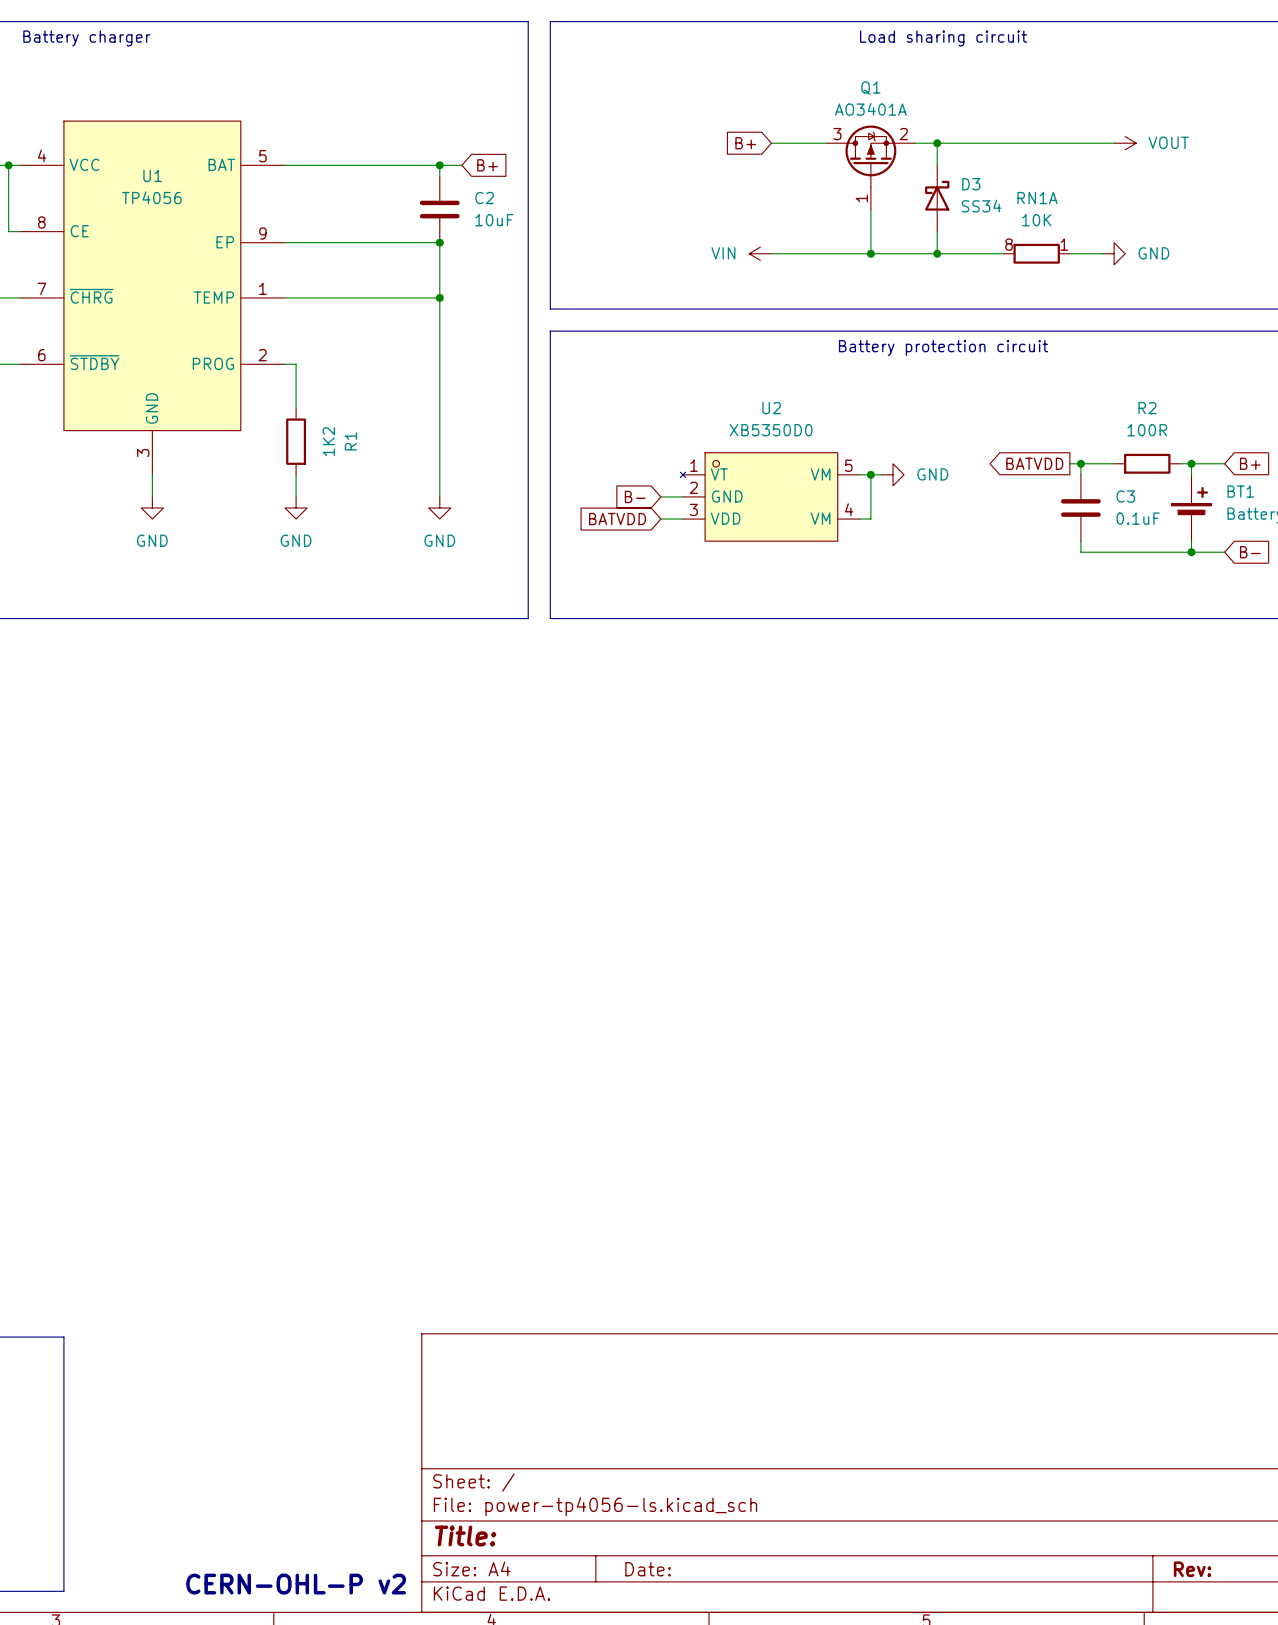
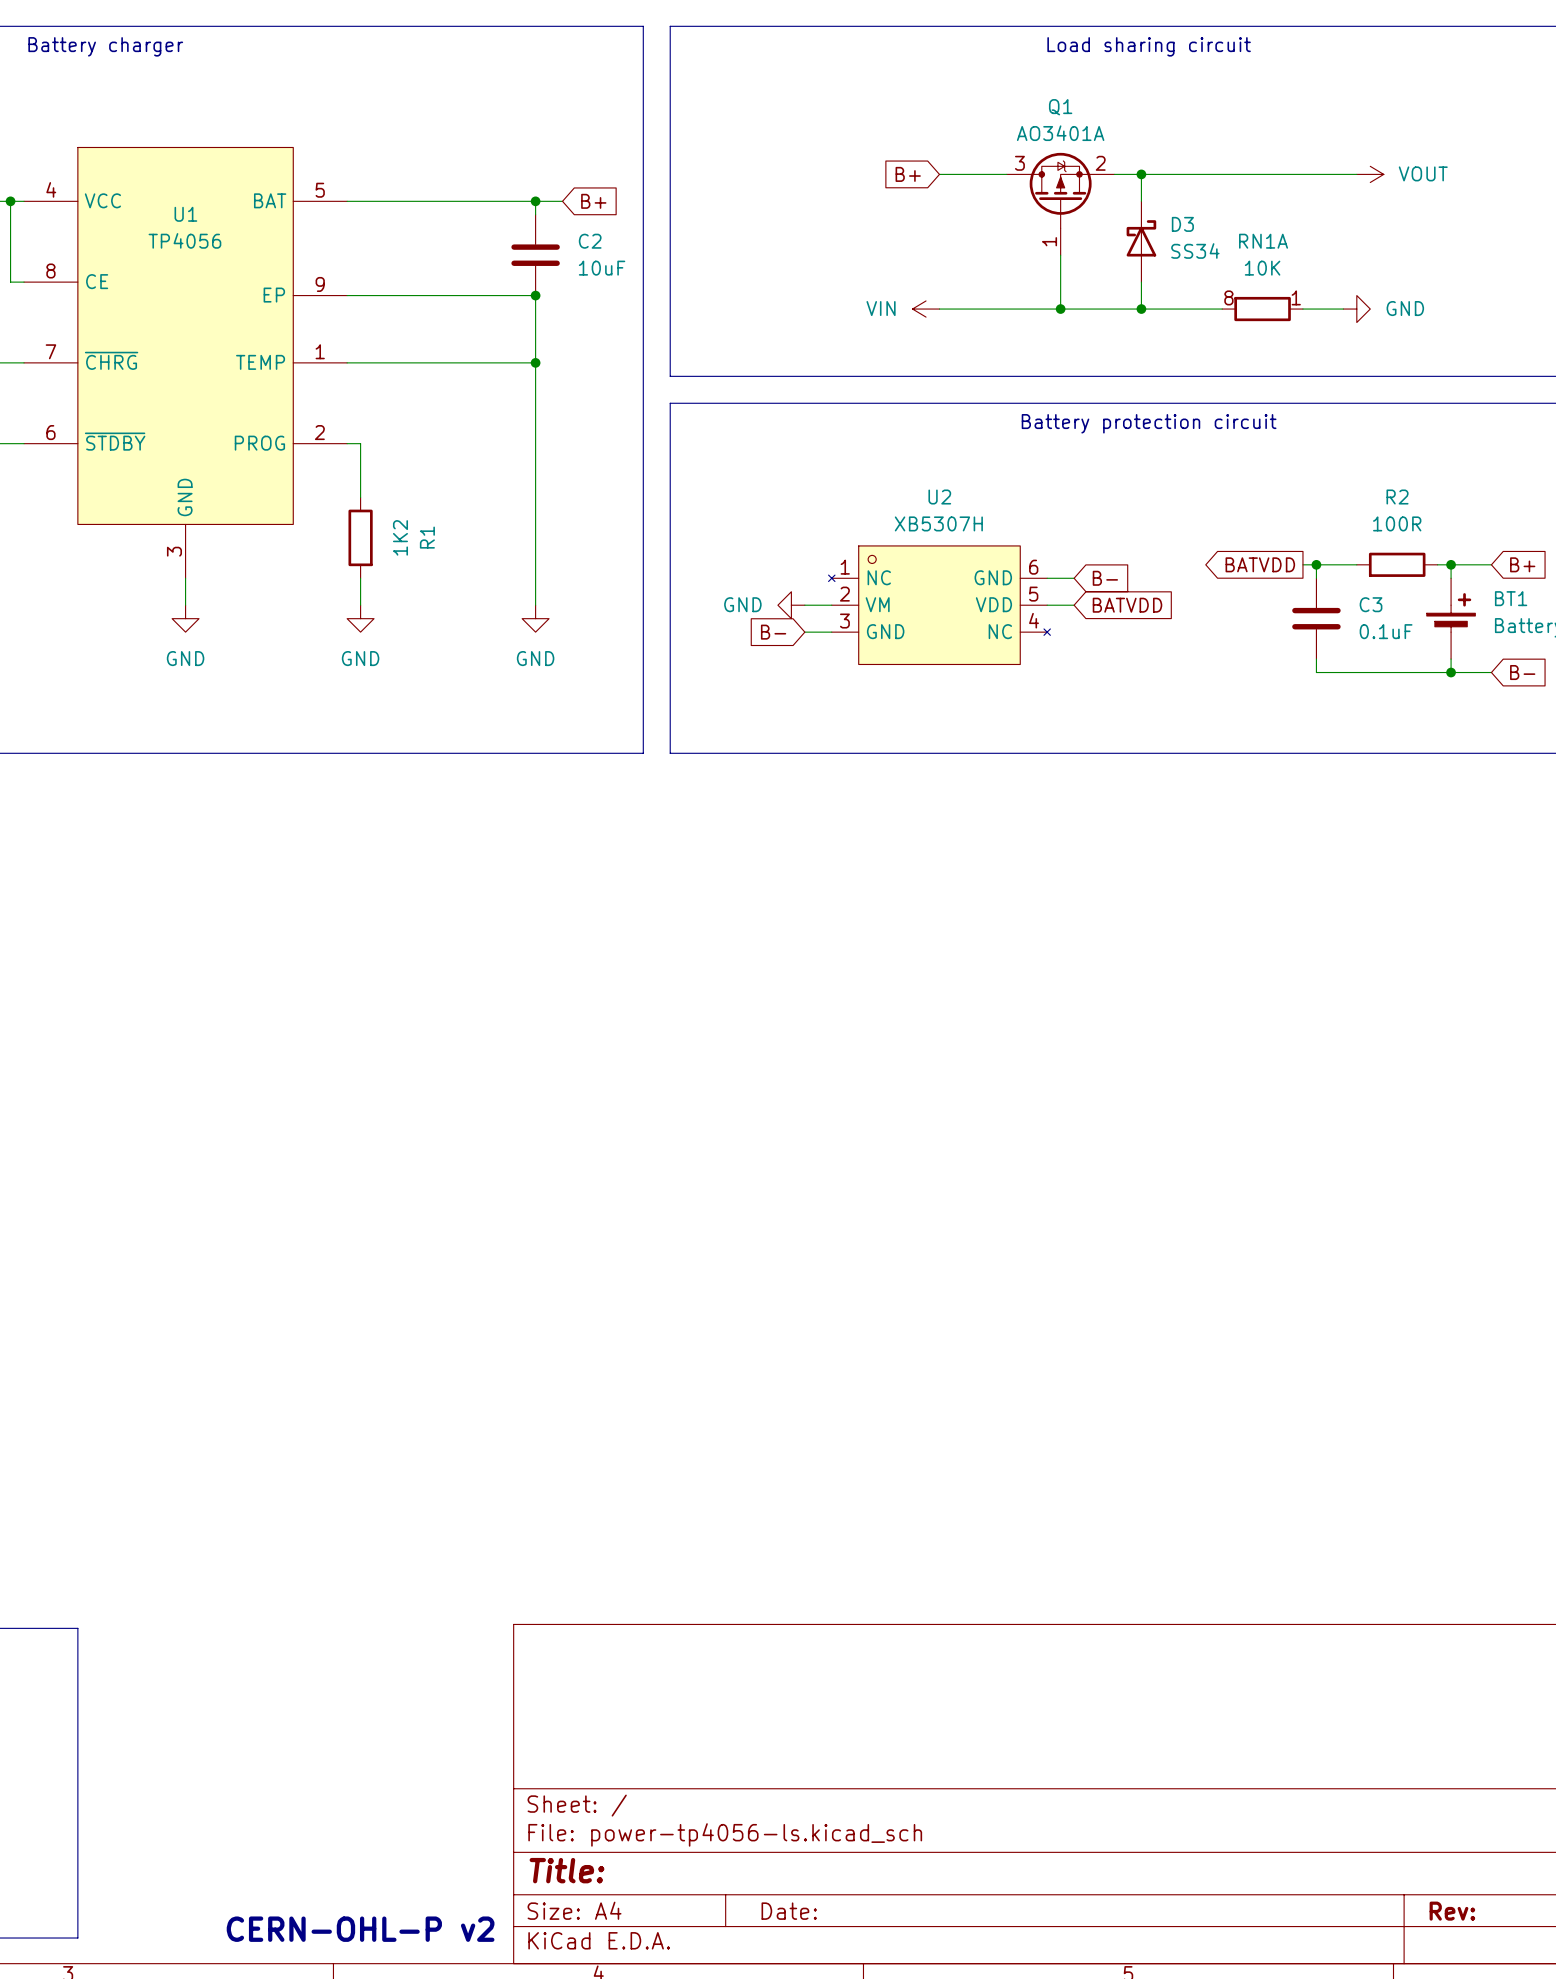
U2 value: XB5350D0 (771, 430) -> XB5307H (938, 523)
U2 symbol: [680, 452, 860, 542] -> [828, 545, 1051, 665]
wire: (870, 474) (870, 519) (859, 519) -> none
junction: (870, 474) -> none
power symbol: GND (893, 474) -> none
global label: none -> B- (1105, 578)
global label: B- (635, 496) -> none
power symbol: none -> GND (791, 605)
wire: none -> (1047, 605) (1074, 605)
global label: none -> BATVDD (1127, 605)
global label: BATVDD (617, 519) -> B- (773, 632)

